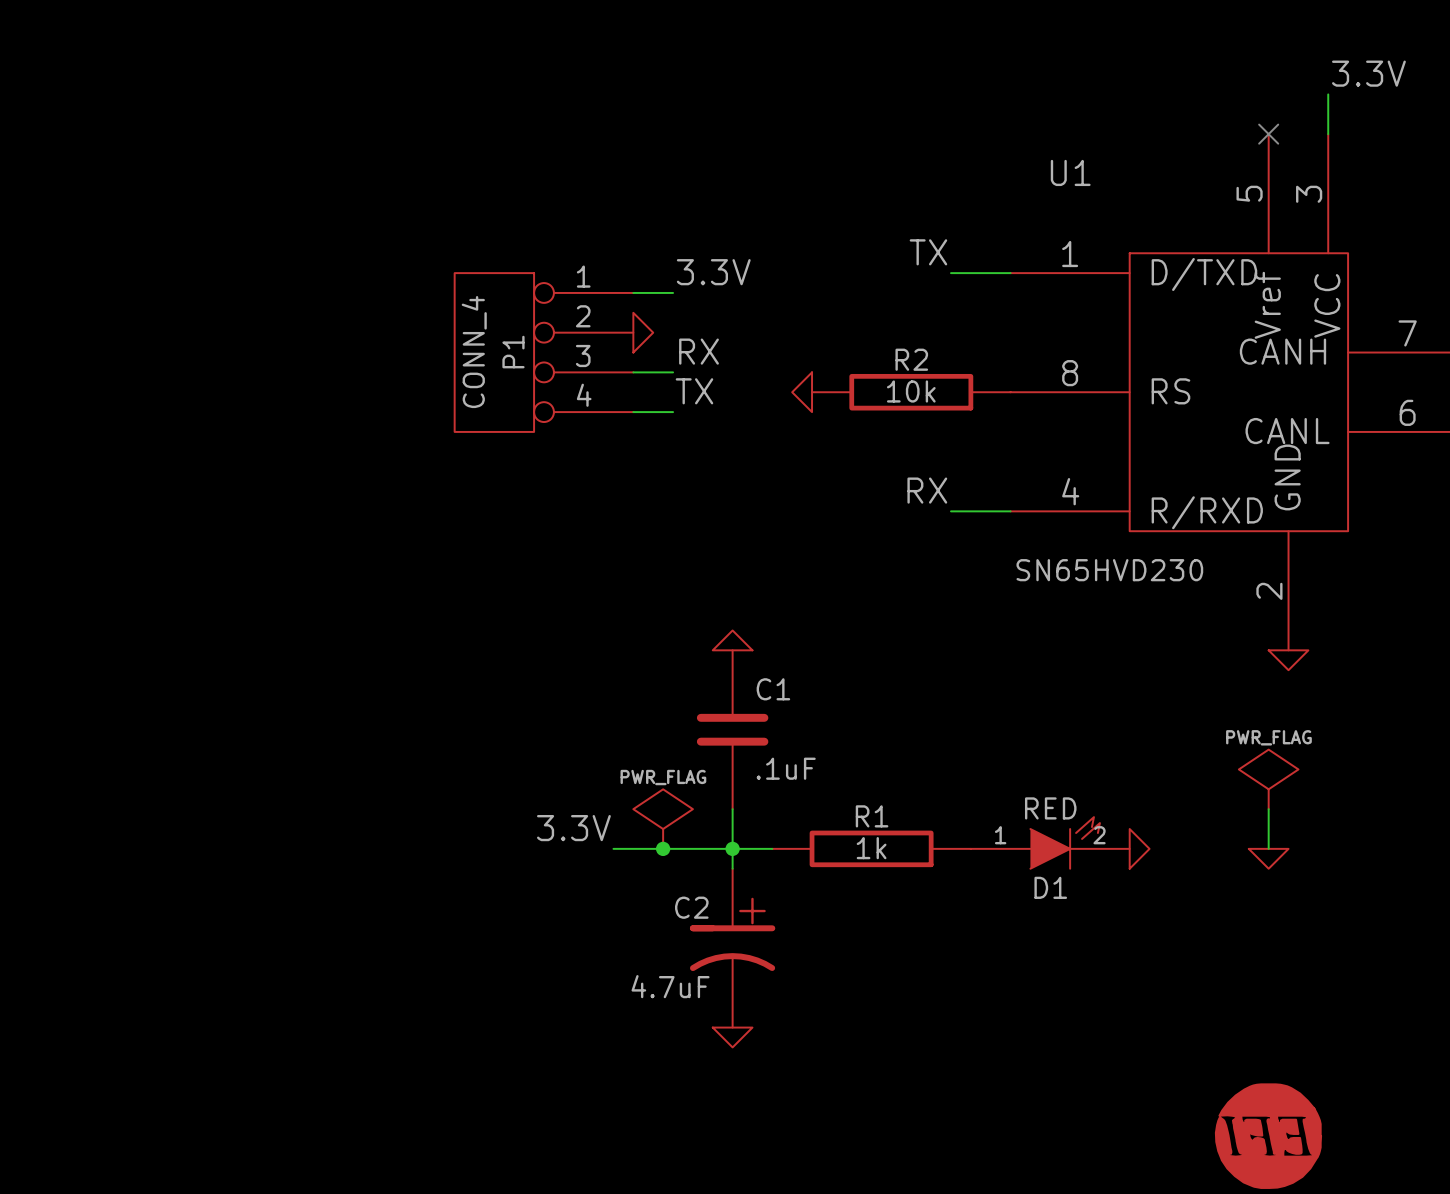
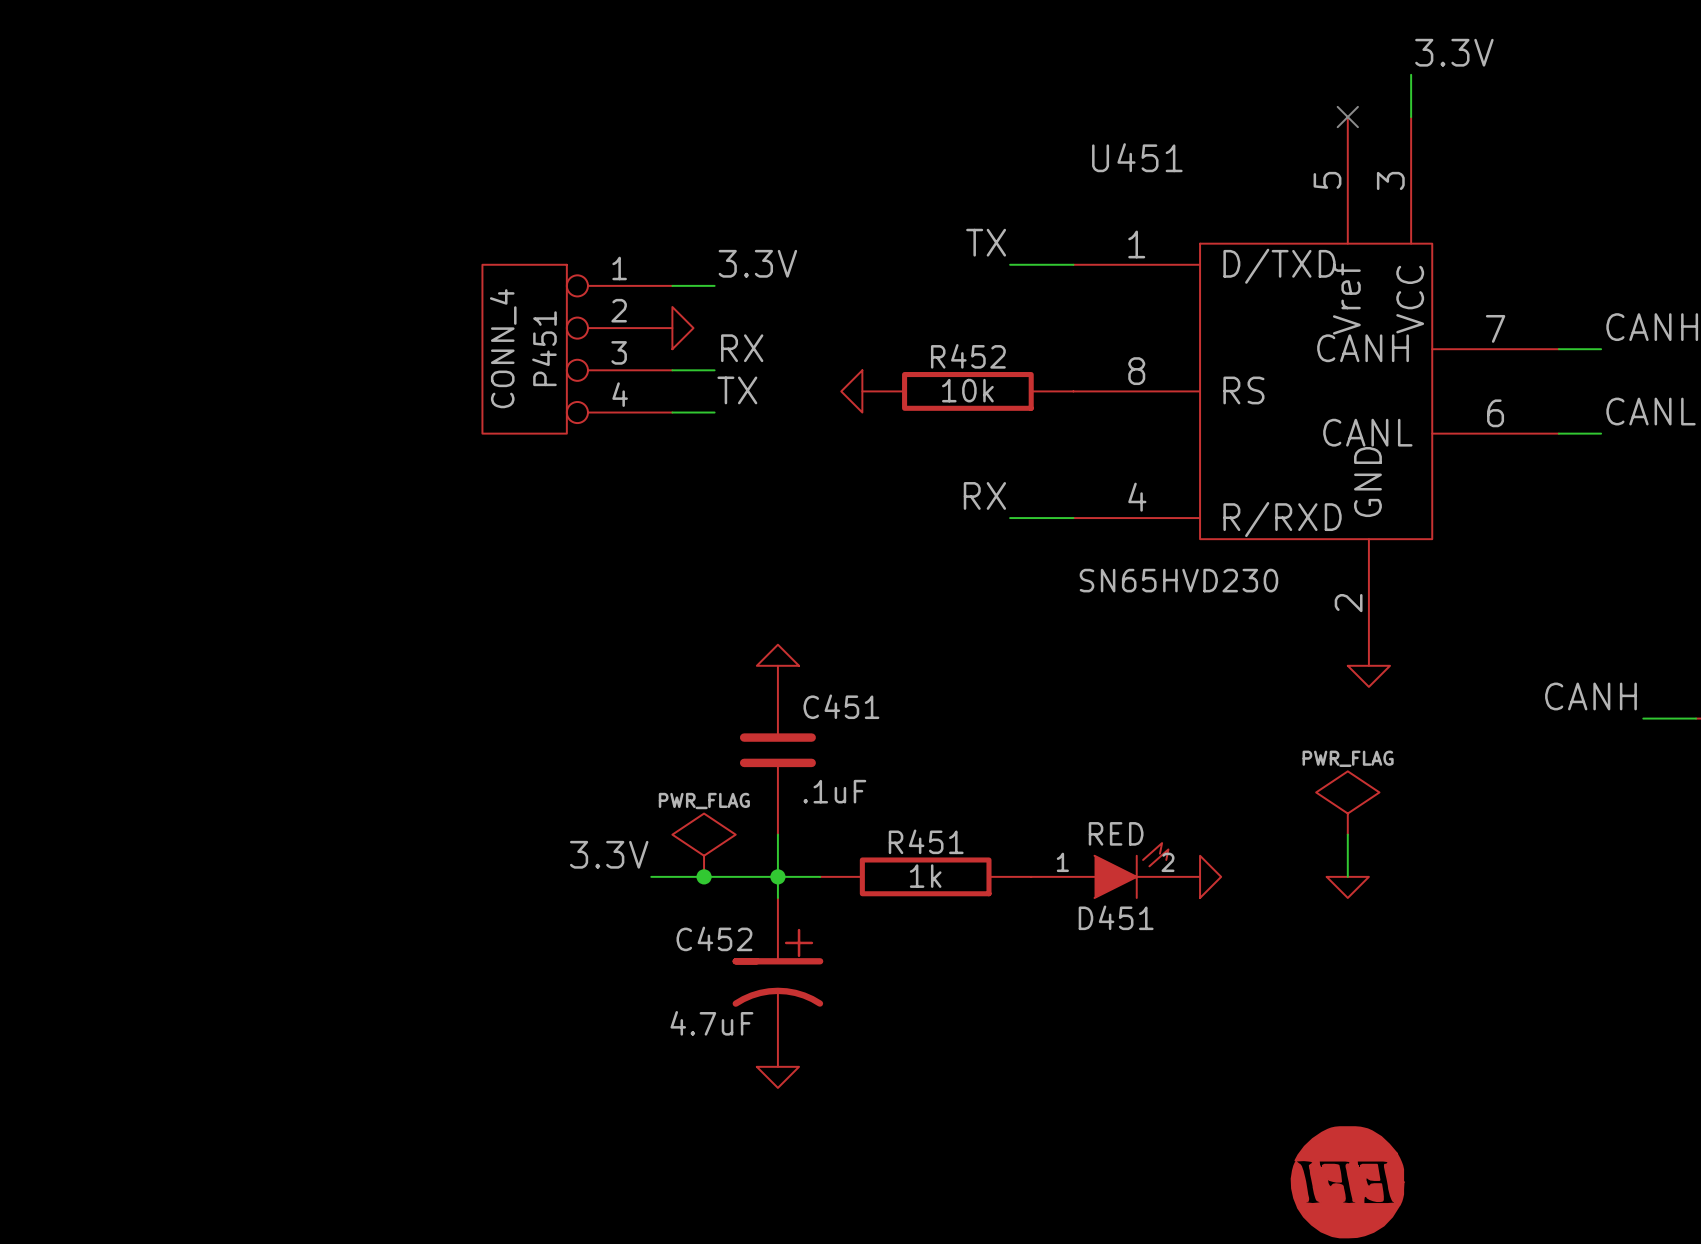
U1 name: U1 (1070, 172) -> U451 (1137, 157)
P1 name: P1 (513, 352) -> P451 (544, 348)
R2 name: R2 (911, 359) -> R452 (968, 356)
C1 name: C1 (773, 689) -> C451 (841, 706)
R1 name: R1 (872, 816) -> R451 (926, 841)
D1 name: D1 (1050, 887) -> D451 (1116, 917)
C2 name: C2 (691, 907) -> C452 (714, 938)

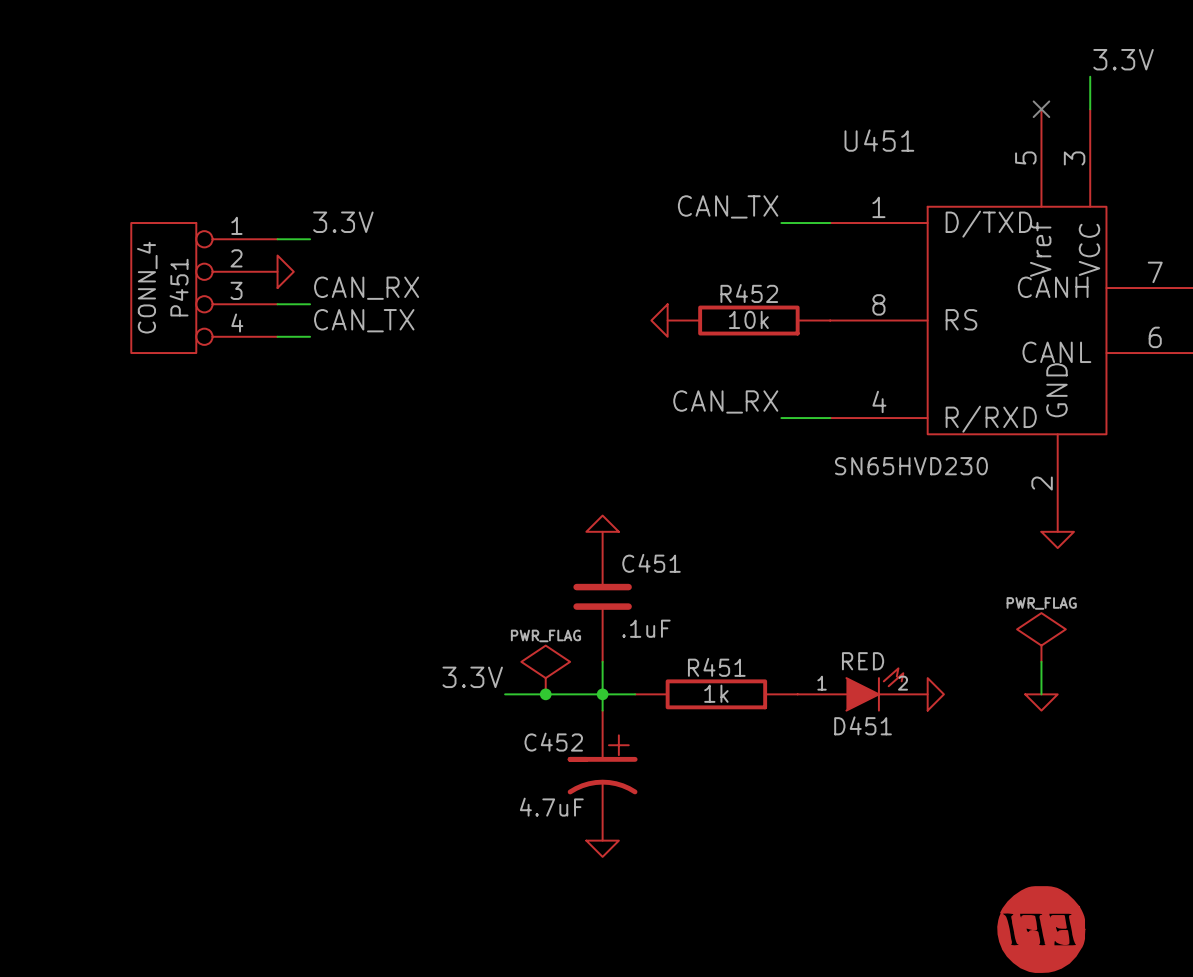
label: TX (986, 242) -> CAN_TX (728, 206)
label position: 3.3V (757, 263) -> 3.3V (343, 222)
wire: (672, 285) (714, 285) -> (277, 239) (310, 239)
power symbol position: (682, 328) -> (285, 271)
label: RX (742, 348) -> none
label: none -> CAN_RX (366, 288)
P451 position: (577, 349) -> (204, 288)
wire: (672, 370) (714, 370) -> (277, 304) (310, 304)
label: TX (737, 390) -> none
label: none -> CAN_TX (364, 320)
wire: (672, 412) (714, 412) -> (277, 336) (310, 336)
label: RX (984, 495) -> CAN_RX (725, 401)

